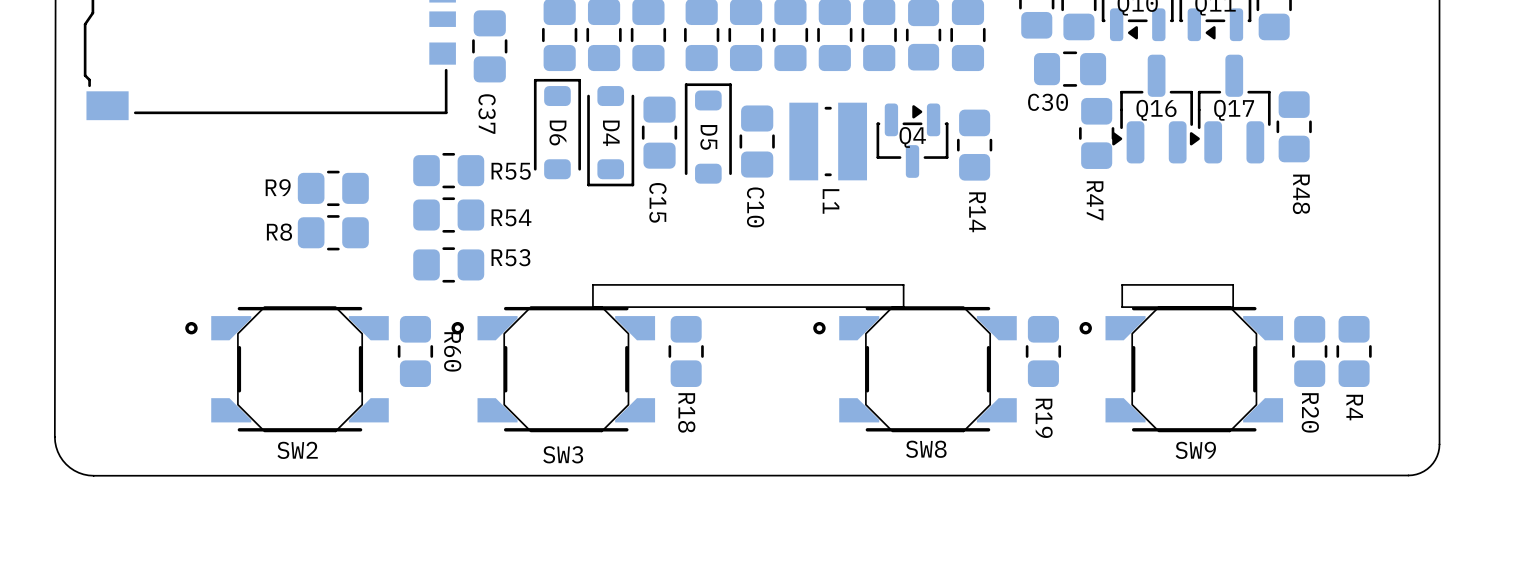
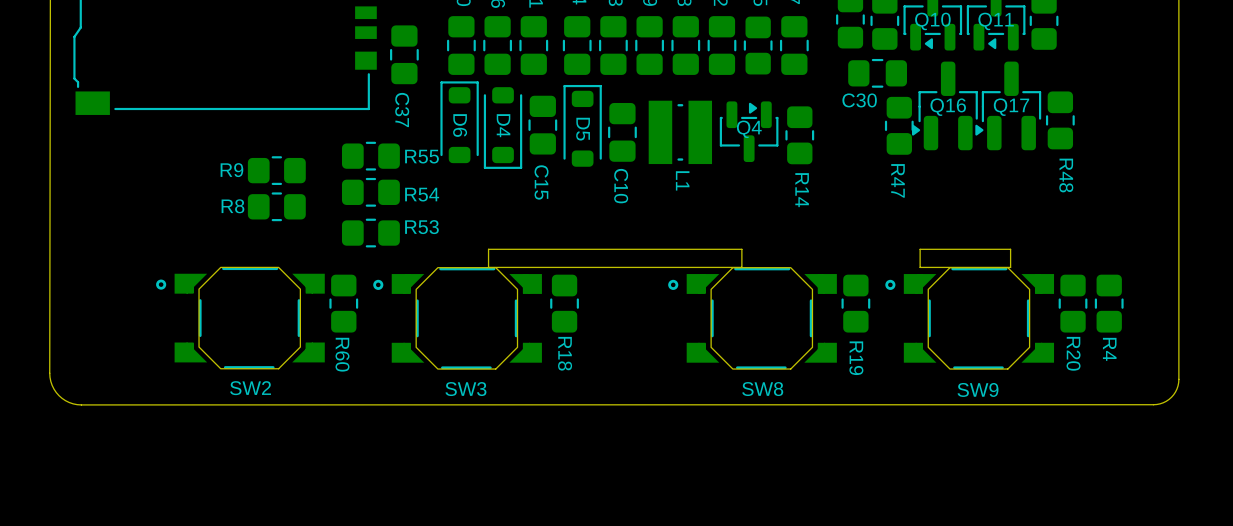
SW2 footprint: [185, 306, 389, 432] -> [156, 267, 325, 369]
SW3 footprint: [451, 306, 656, 432] -> [373, 267, 542, 370]
SW8 footprint: [813, 306, 1017, 432] -> [668, 267, 837, 370]
SW9 footprint: [1079, 306, 1284, 432] -> [885, 267, 1055, 370]
R60 name position: R60 (452, 351) -> R60 (342, 354)

